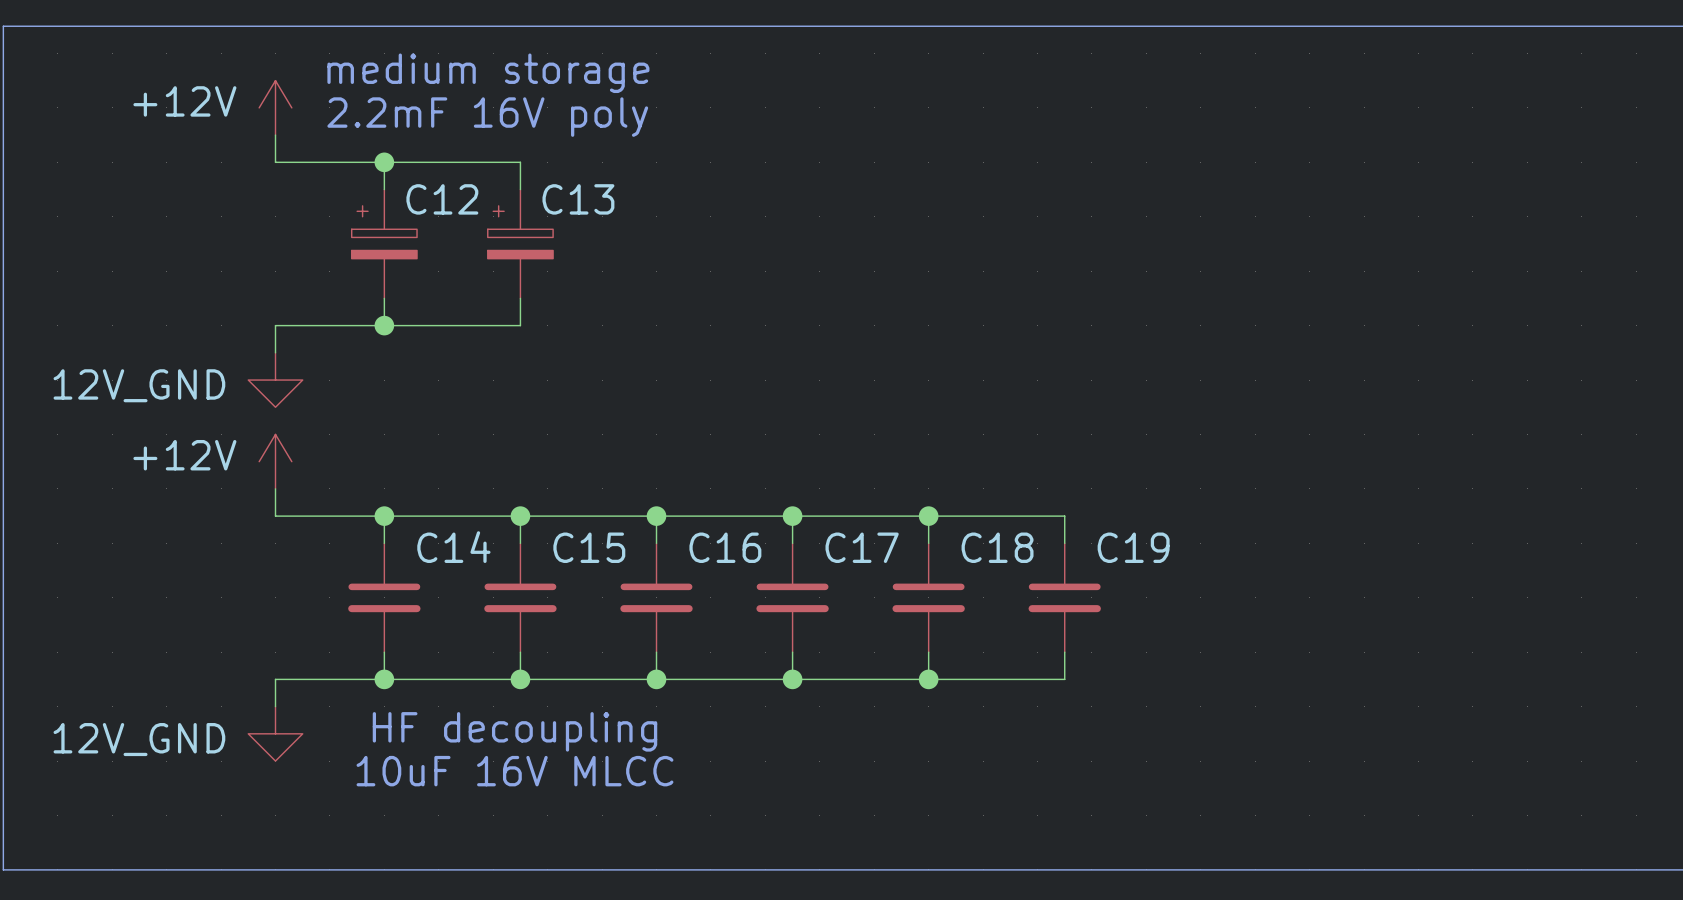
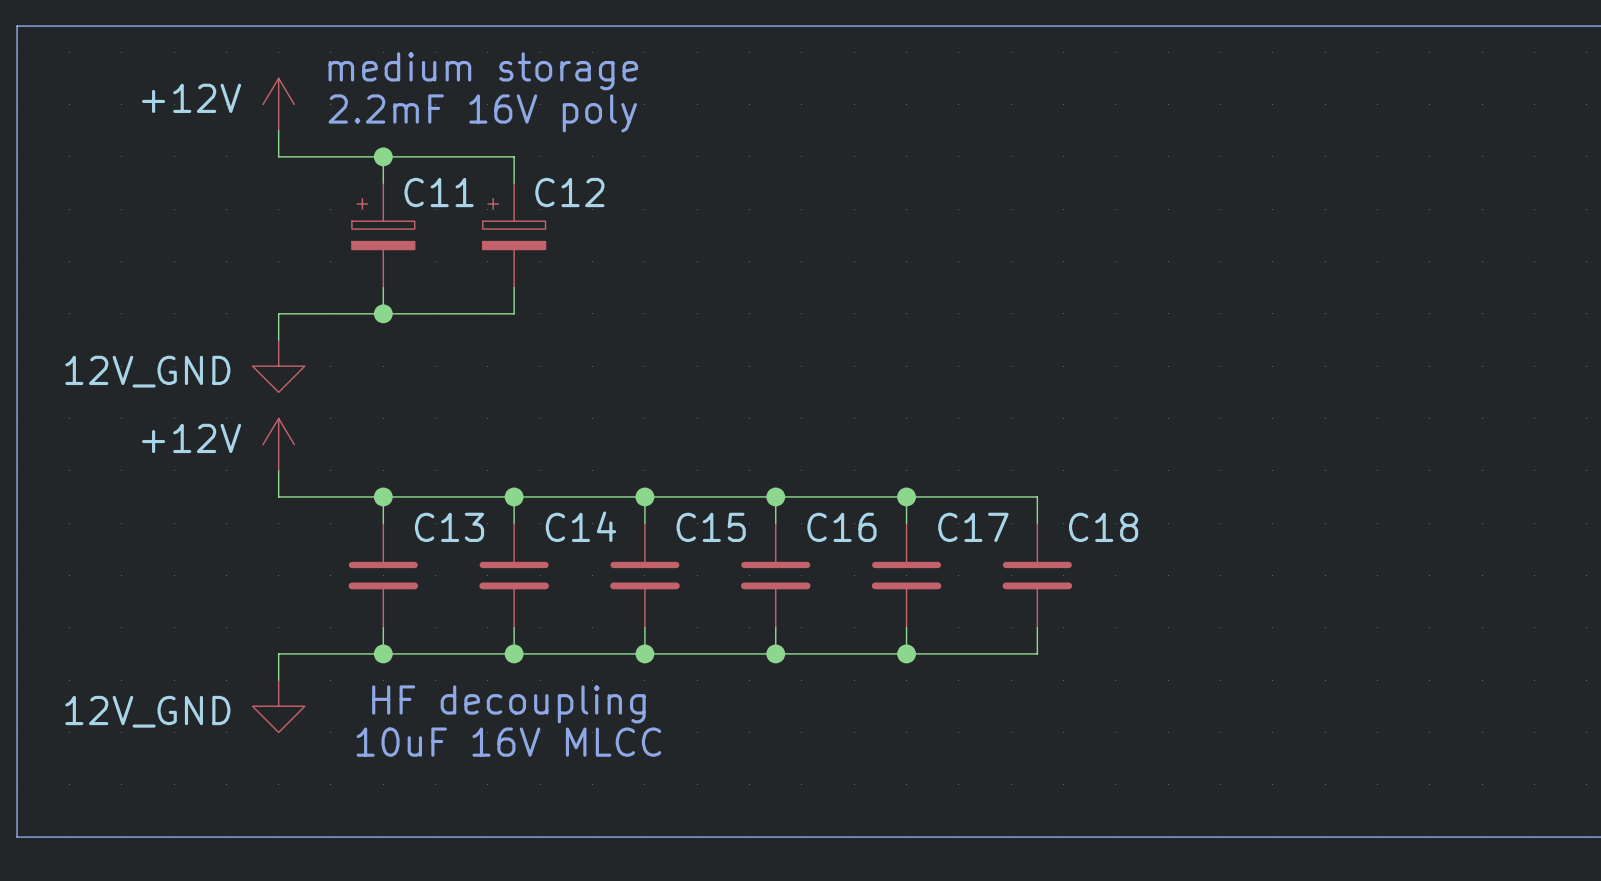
C12 name: C12 (442, 199) -> C11 (439, 192)
C13 name: C13 (578, 199) -> C12 (569, 192)
C14 name: C14 (453, 547) -> C13 (449, 527)
C15 name: C15 (589, 547) -> C14 (580, 526)
C16 name: C16 (725, 547) -> C15 (711, 527)
C17 name: C17 (862, 547) -> C16 (841, 527)
C18 name: C18 (997, 547) -> C17 (973, 527)
C19 name: C19 (1133, 547) -> C18 (1103, 527)

